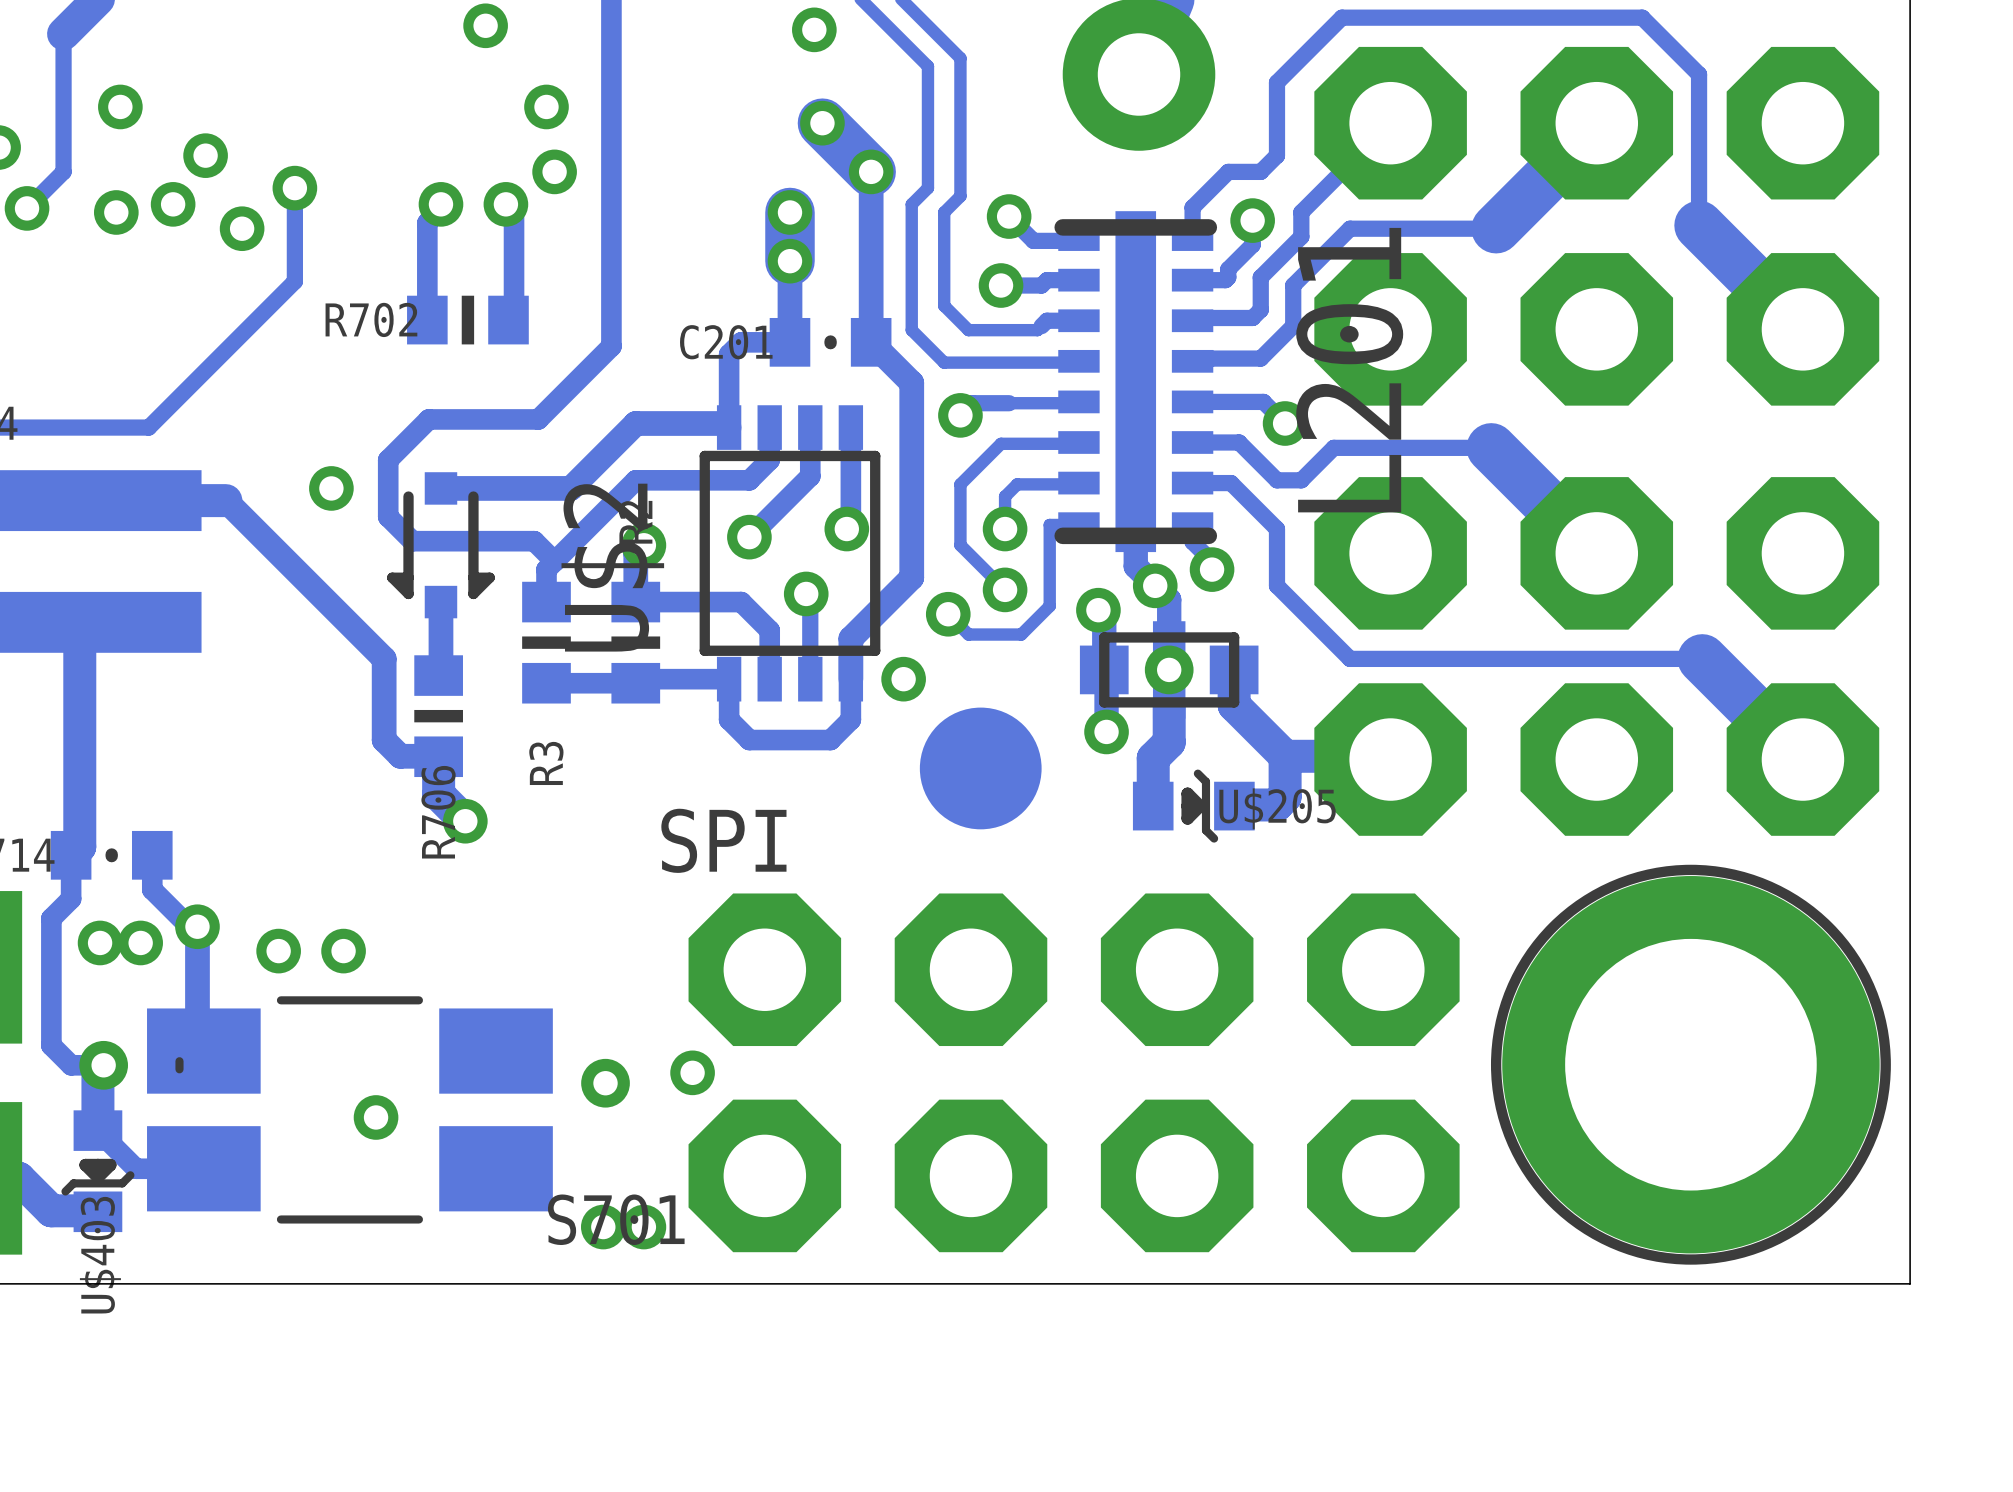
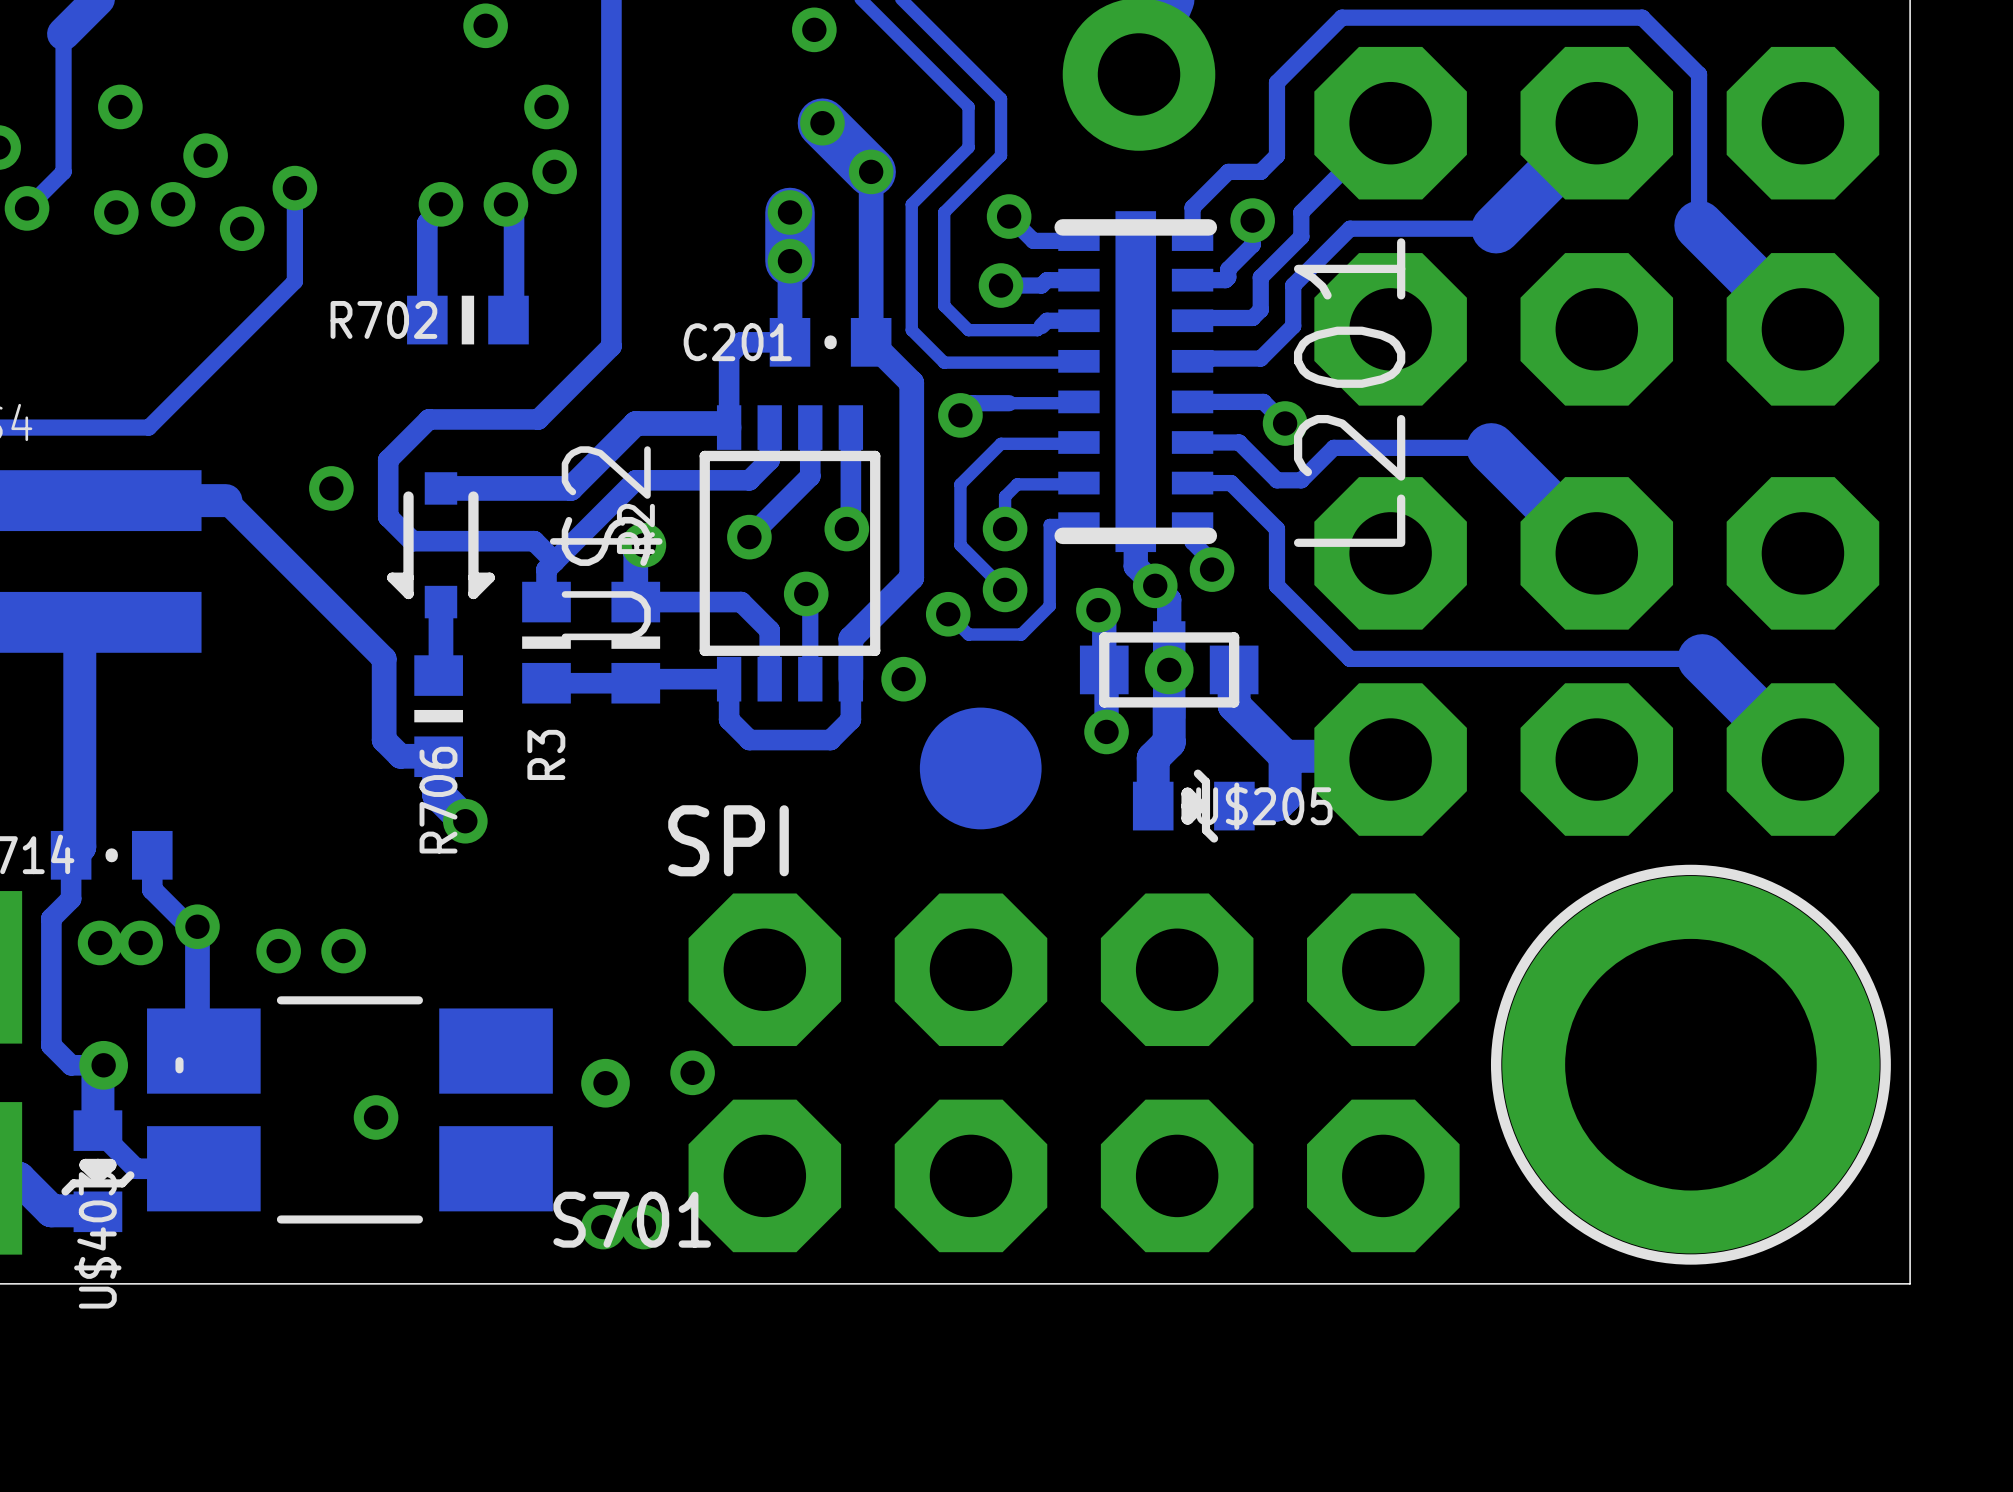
track: (960, 58) (960, 196) -> (960, 58) (1001, 98) (1001, 155) (960, 196)
track: (927, 66) (927, 188) -> (927, 66) (968, 106) (968, 147) (927, 188)

